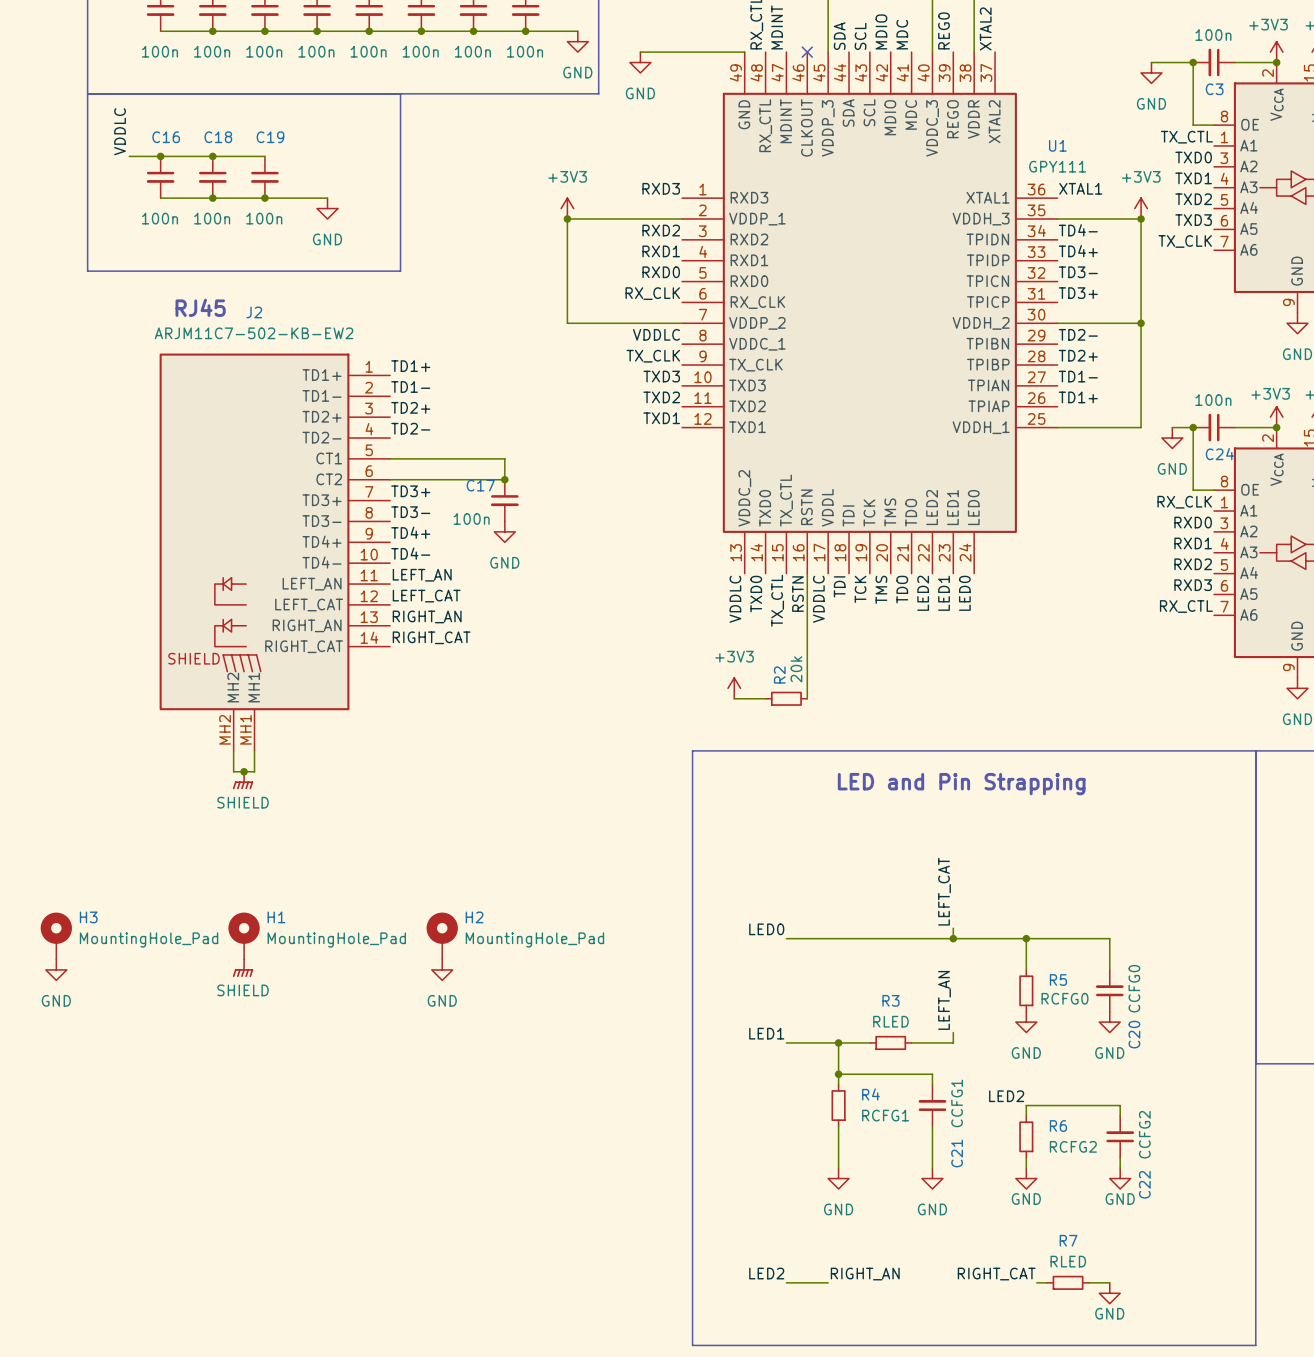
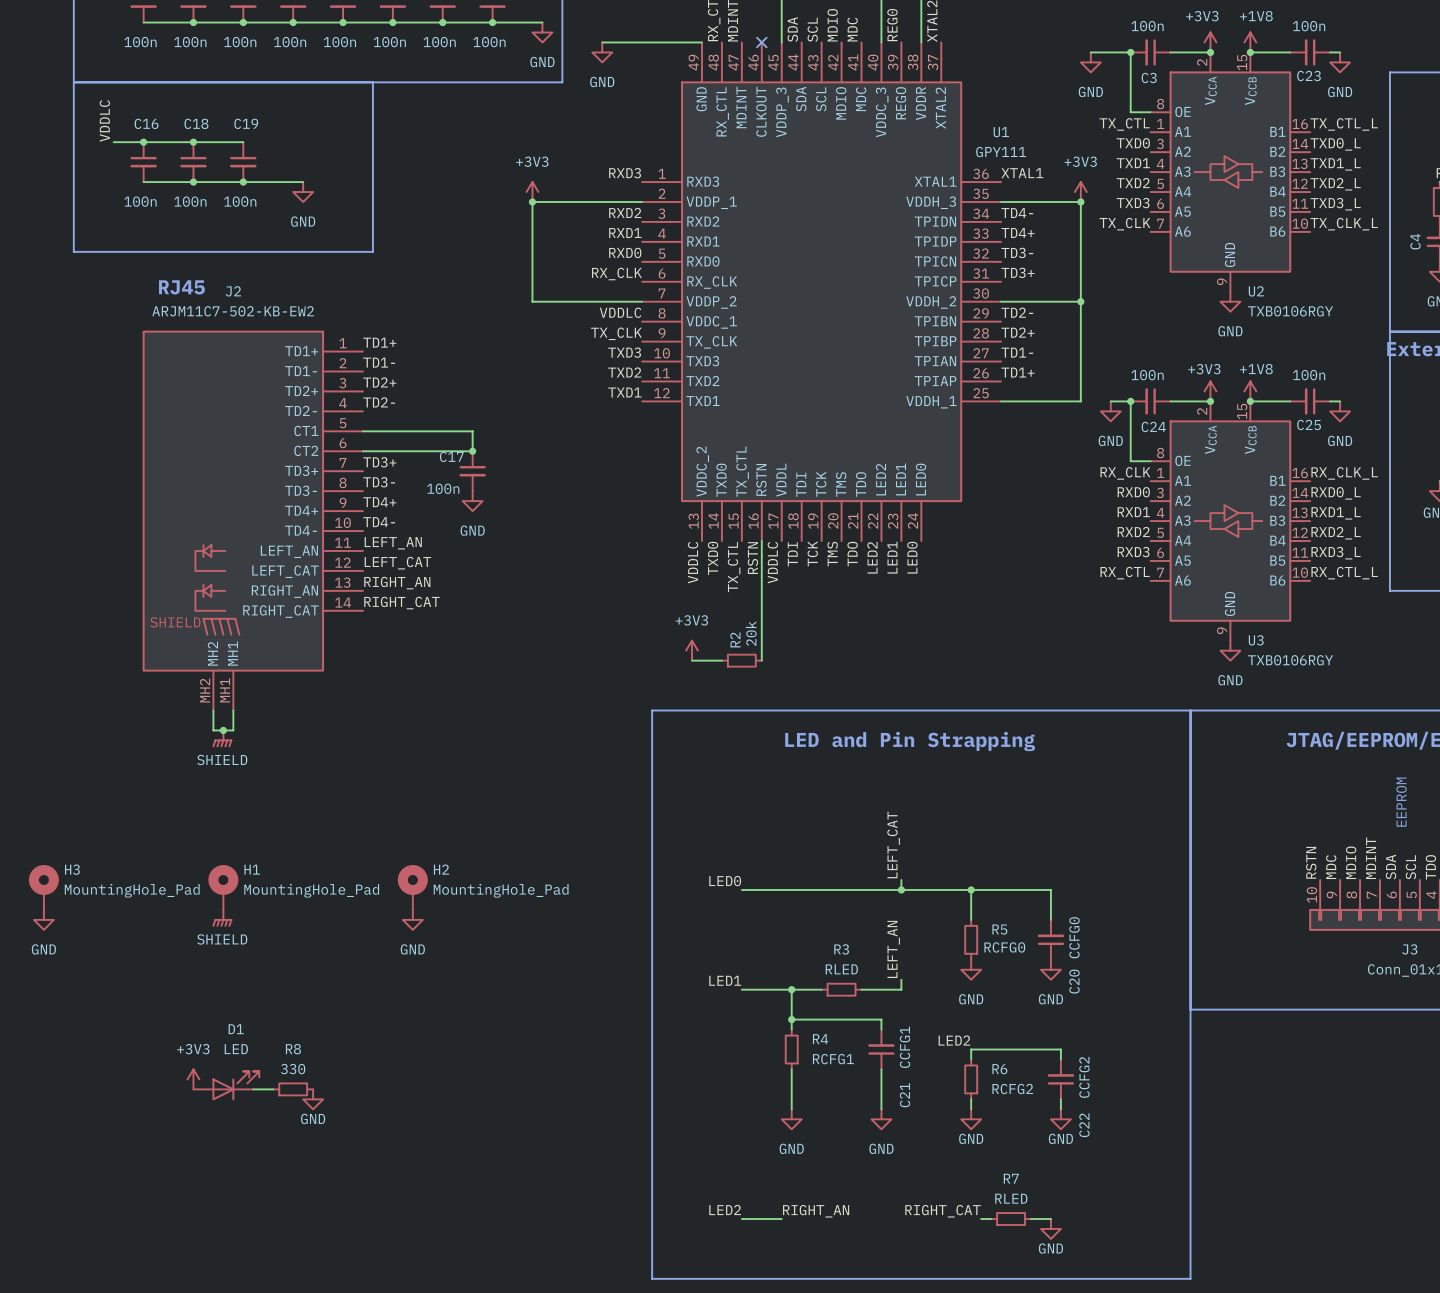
power symbol: none -> +3V3 (193, 1079)
D1: none -> LED (226, 1085)
wire: none -> (253, 1089) (273, 1089)
R8: none -> 330 (293, 1089)
power symbol: none -> GND (313, 1099)

